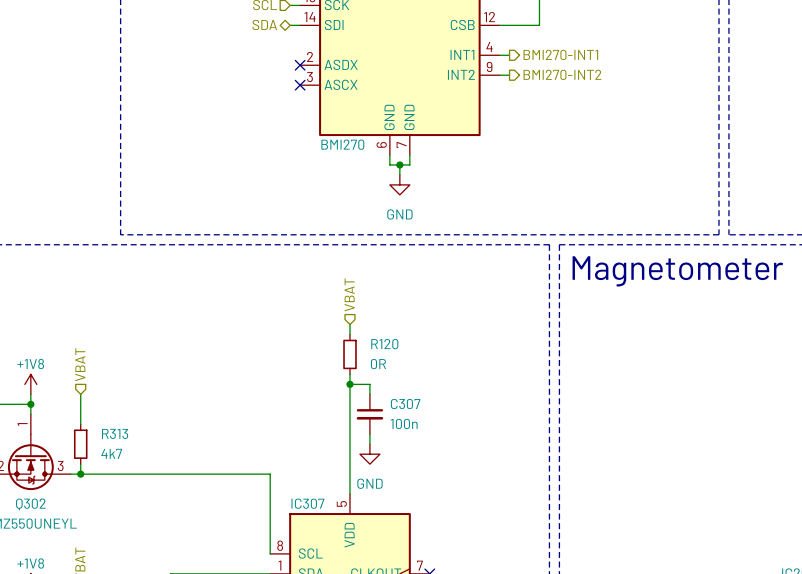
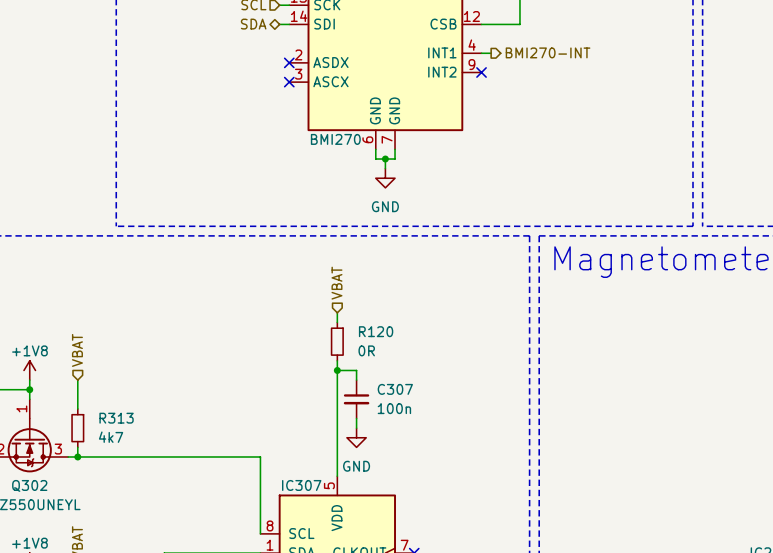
hierarchical label: BMI270-INT1 (560, 54) -> BMI270-INT (548, 52)
hierarchical label: BMI270-INT2 (562, 74) -> none
wire: (499, 75) (509, 75) -> none
no-connect mark: none -> (481, 72)

